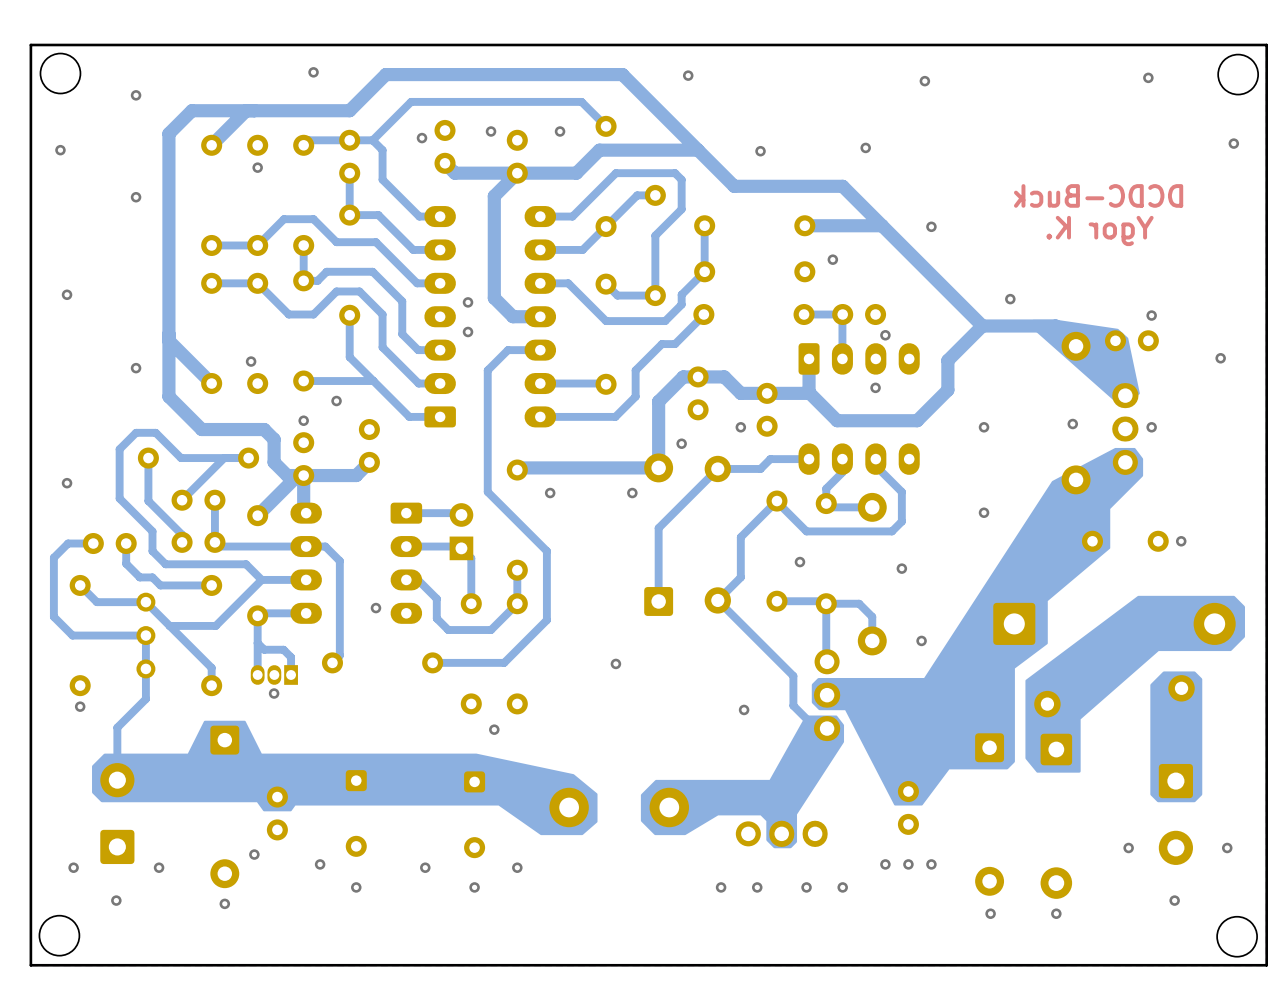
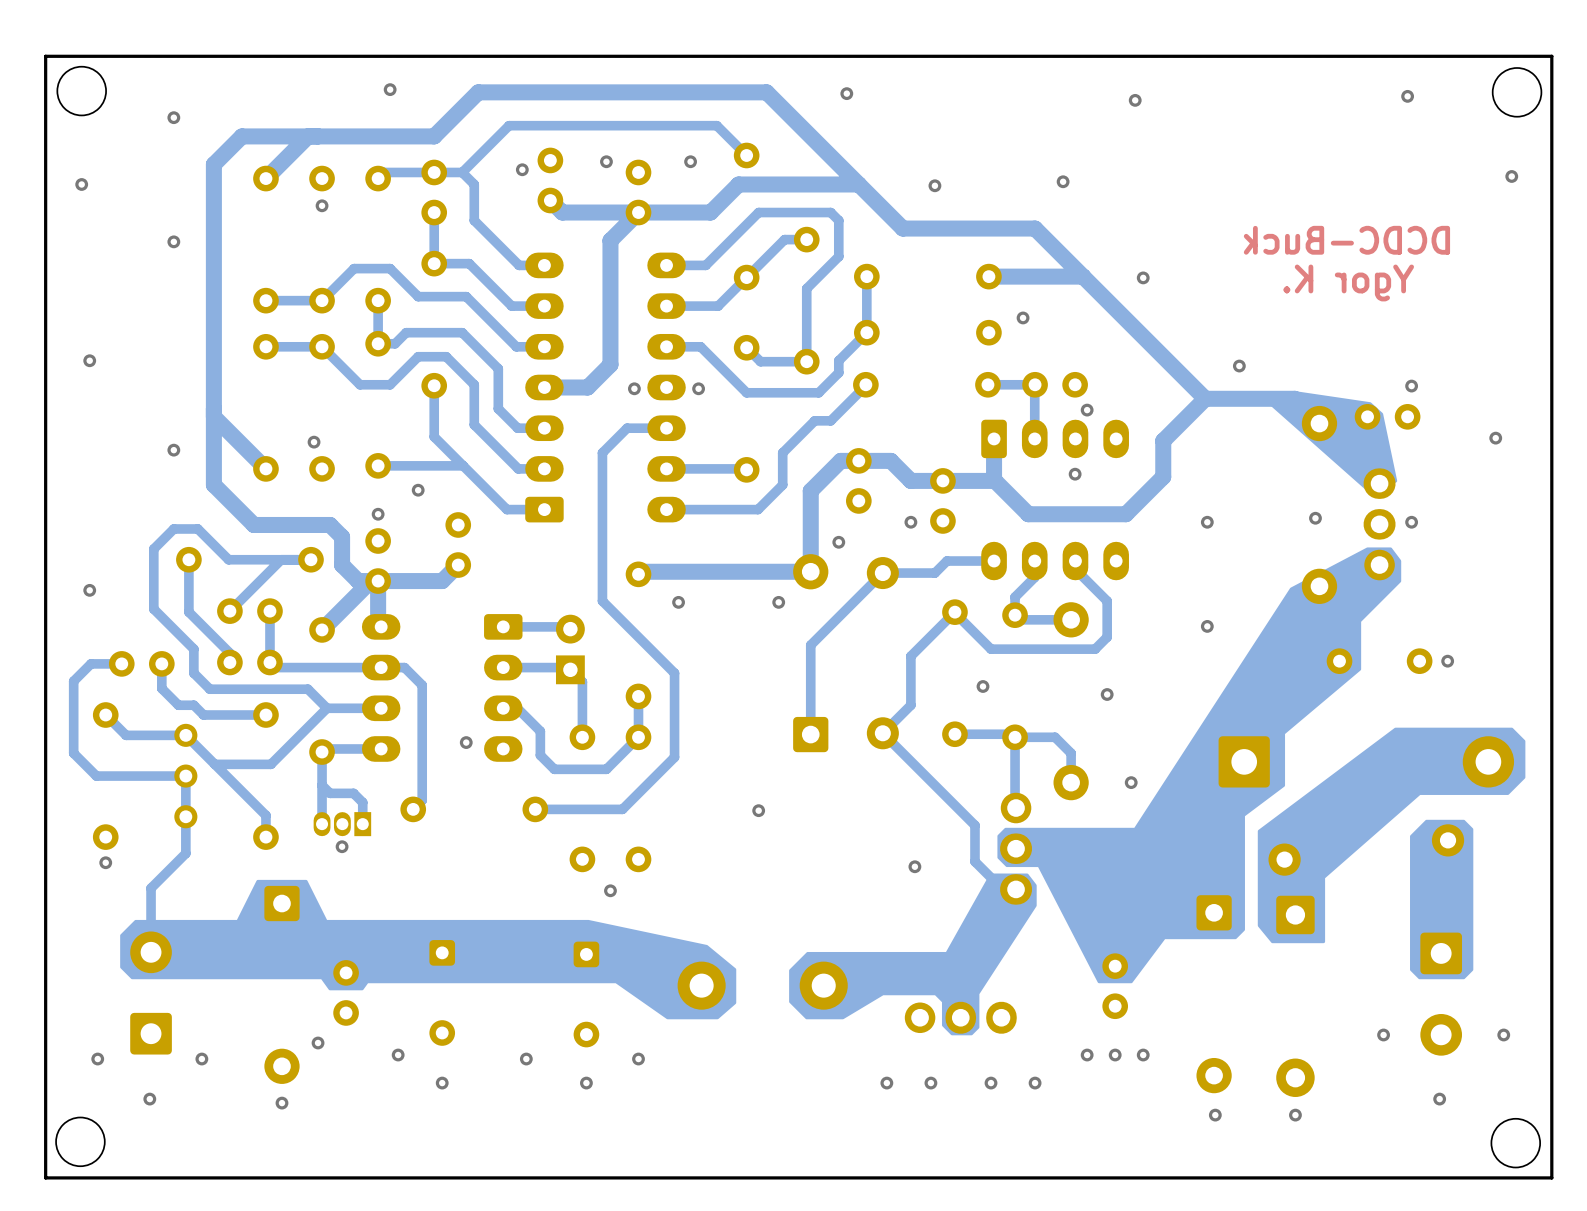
bottom track: (494, 298) (512, 316) (540, 316) -> (610, 364) (587, 387) (544, 387)
via: (468, 302) -> none
via: none -> (634, 388)
via: none -> (698, 388)
via: (468, 331) -> none

